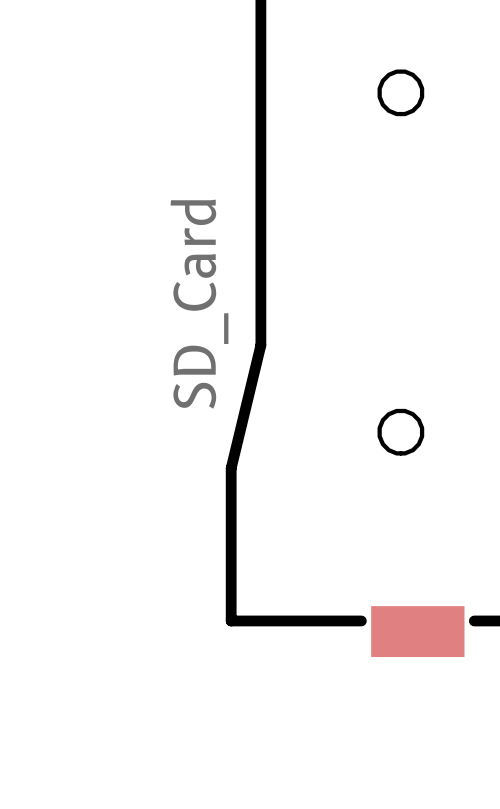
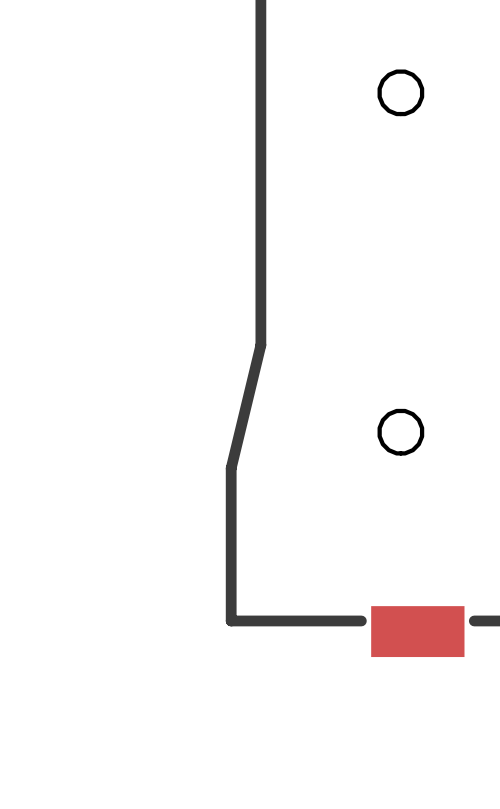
part value: SD_Card (199, 304) -> none

